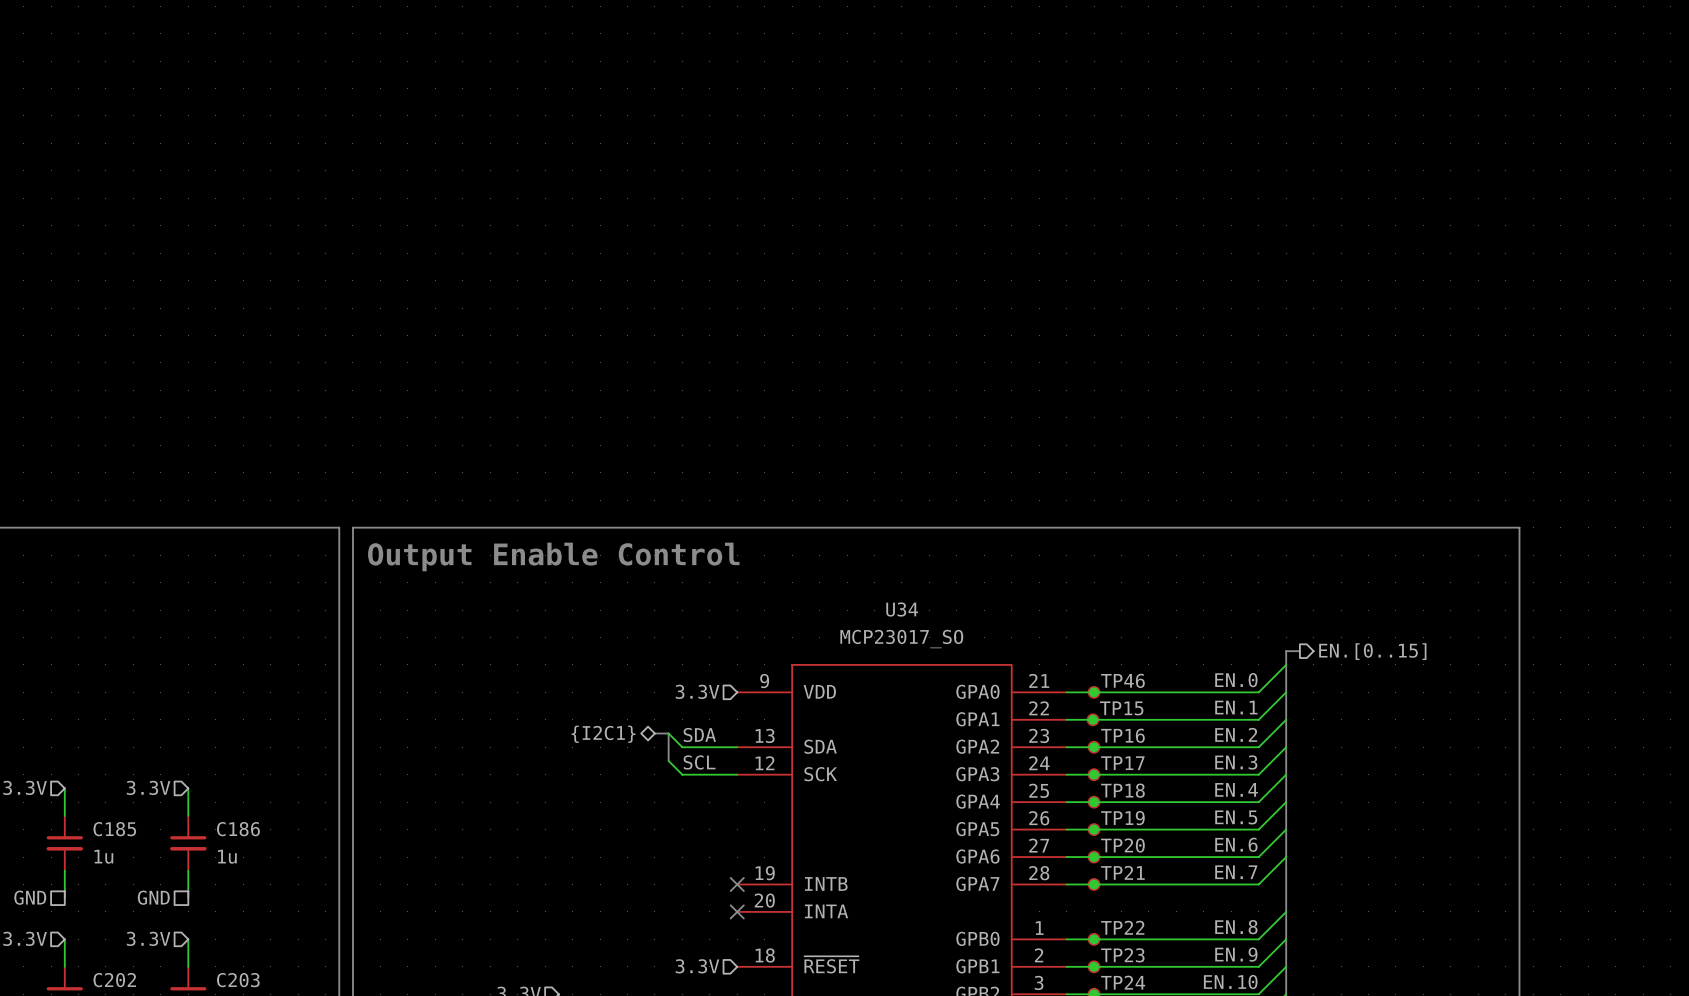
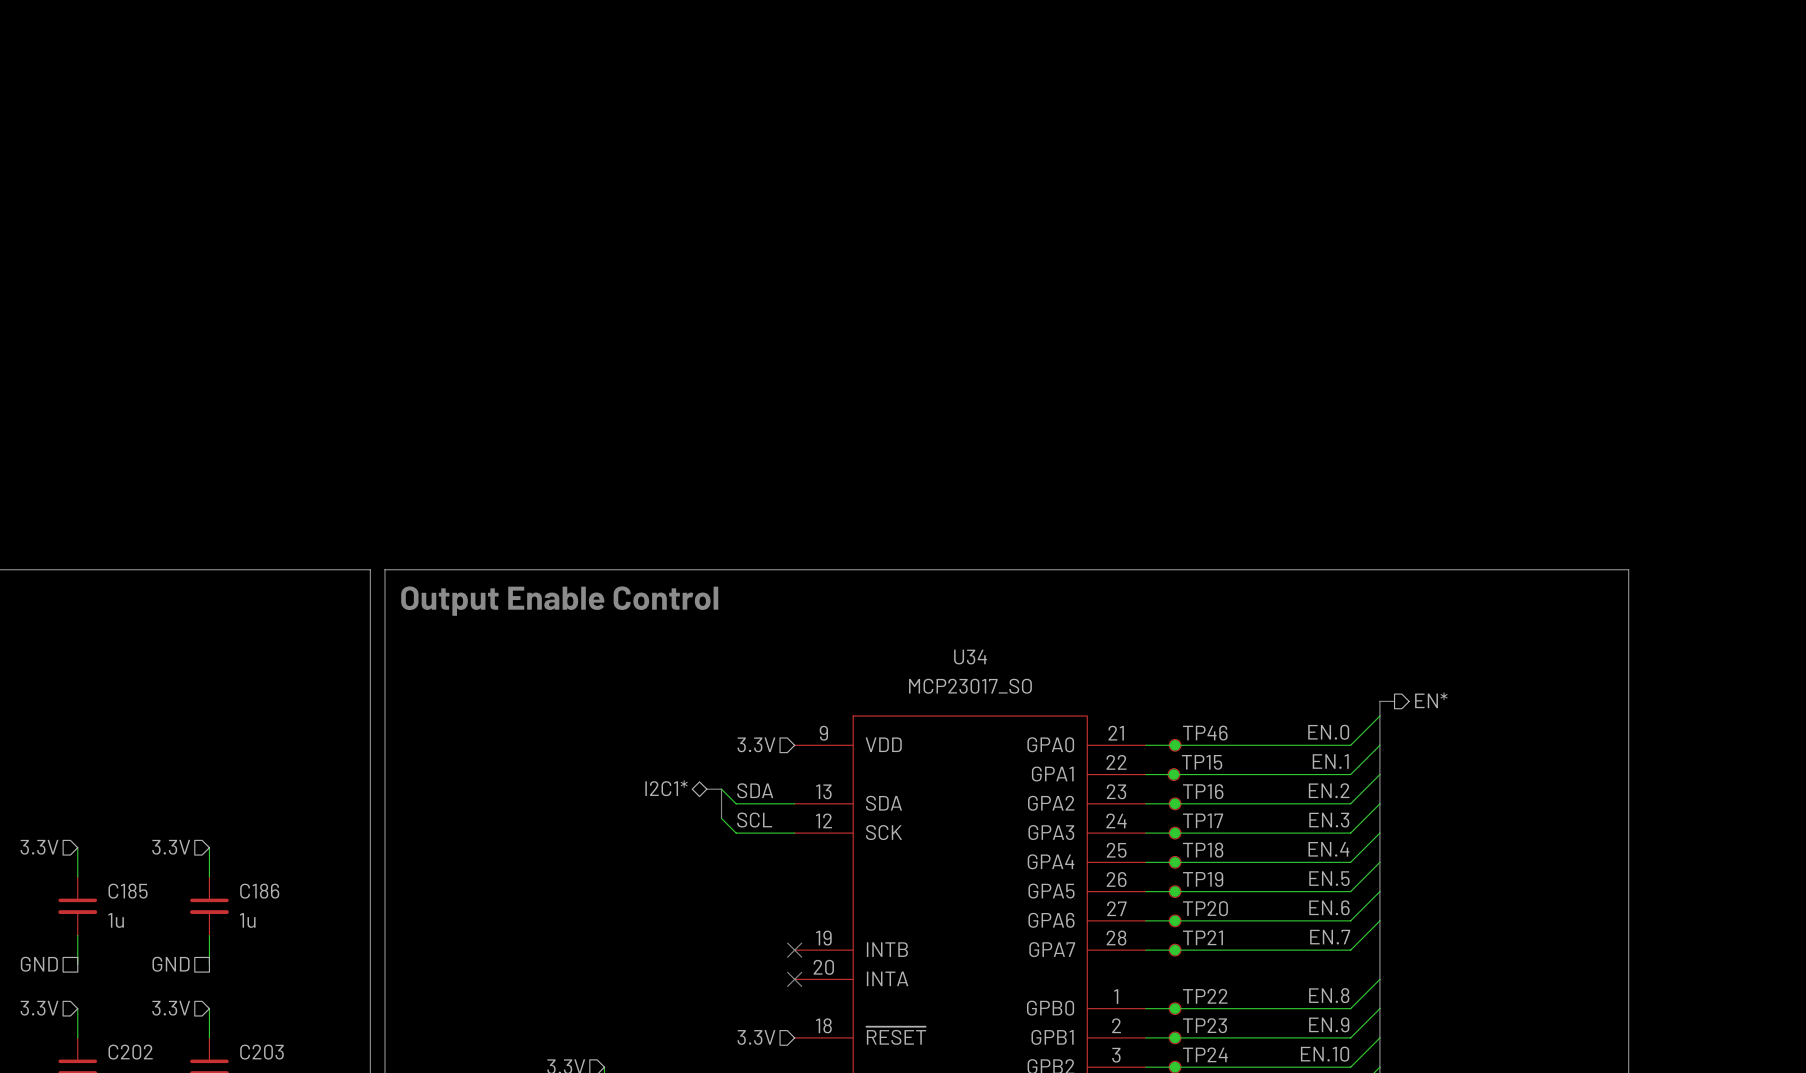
hierarchical label: EN.[0..15] (1372, 651) -> EN* (1431, 700)
hierarchical label: {I2C1} (603, 734) -> I2C1* (666, 788)

